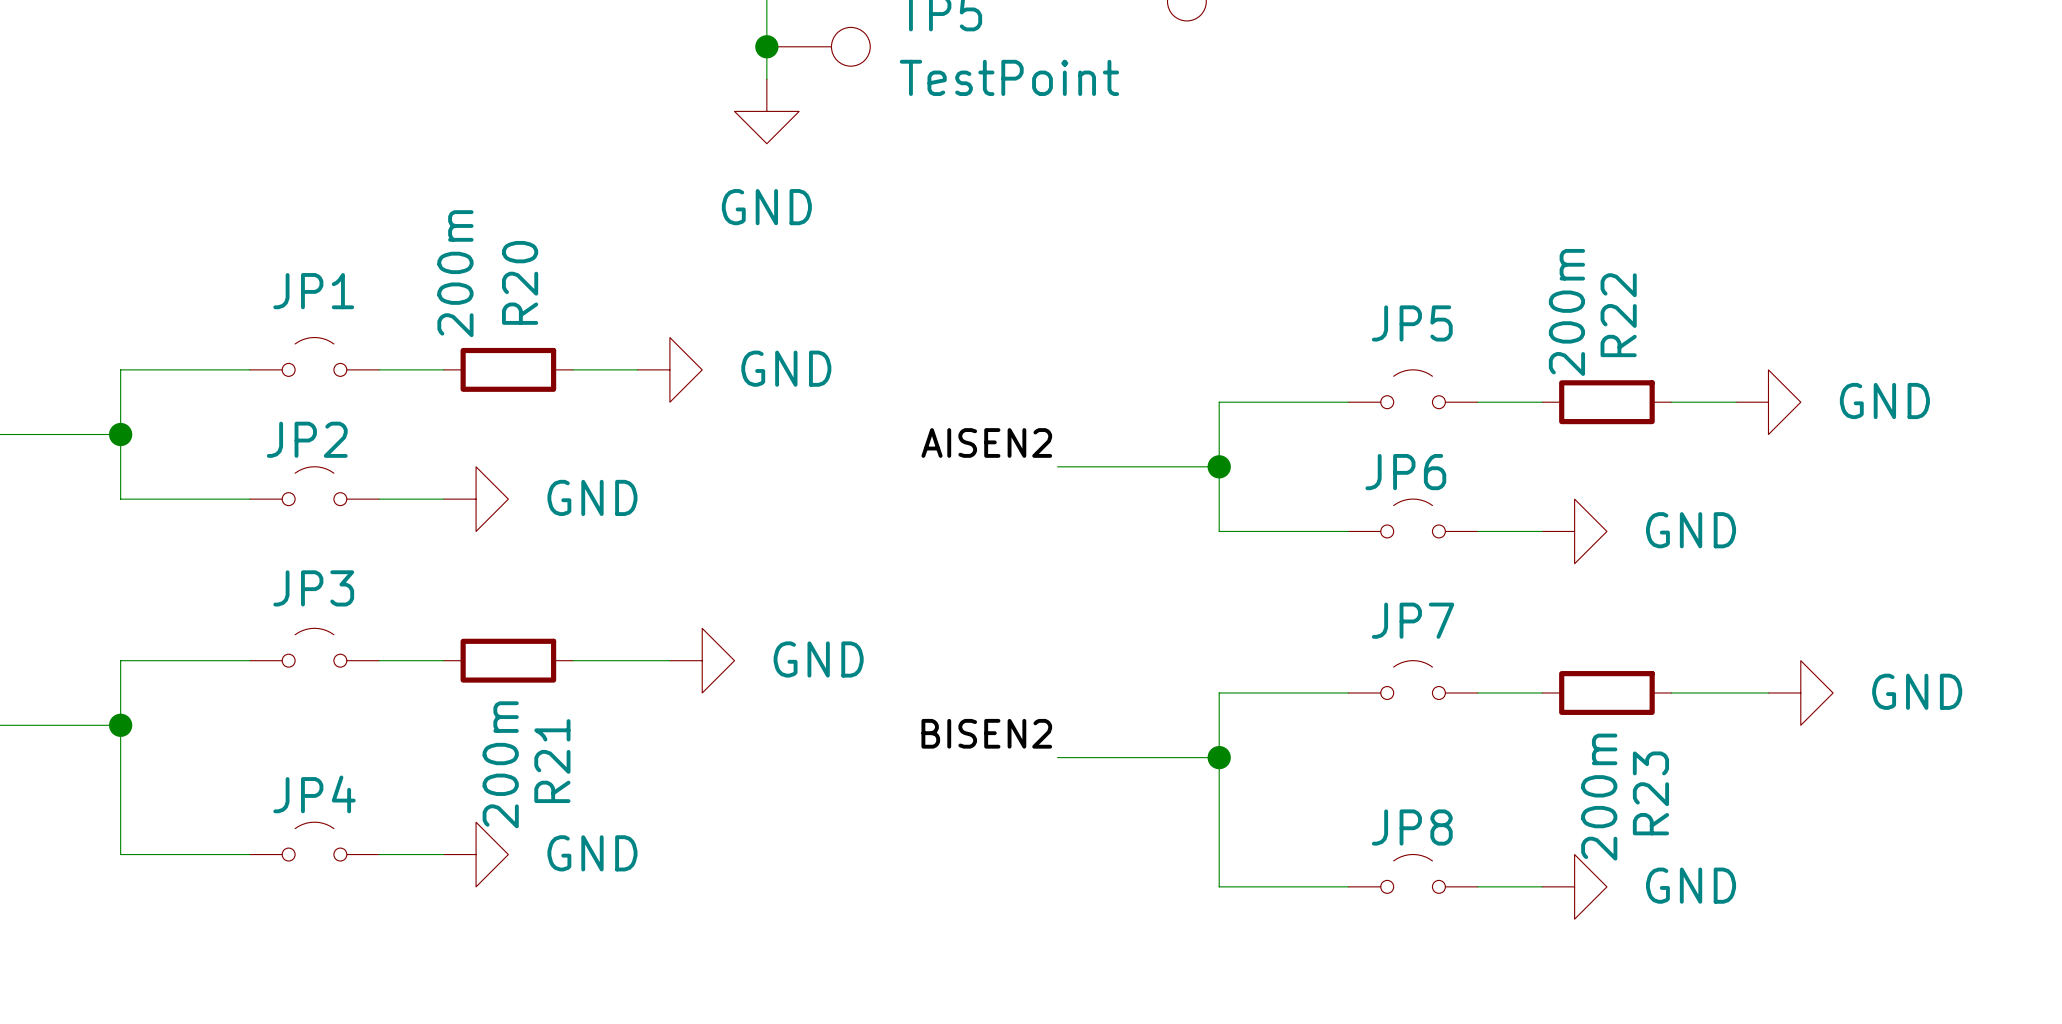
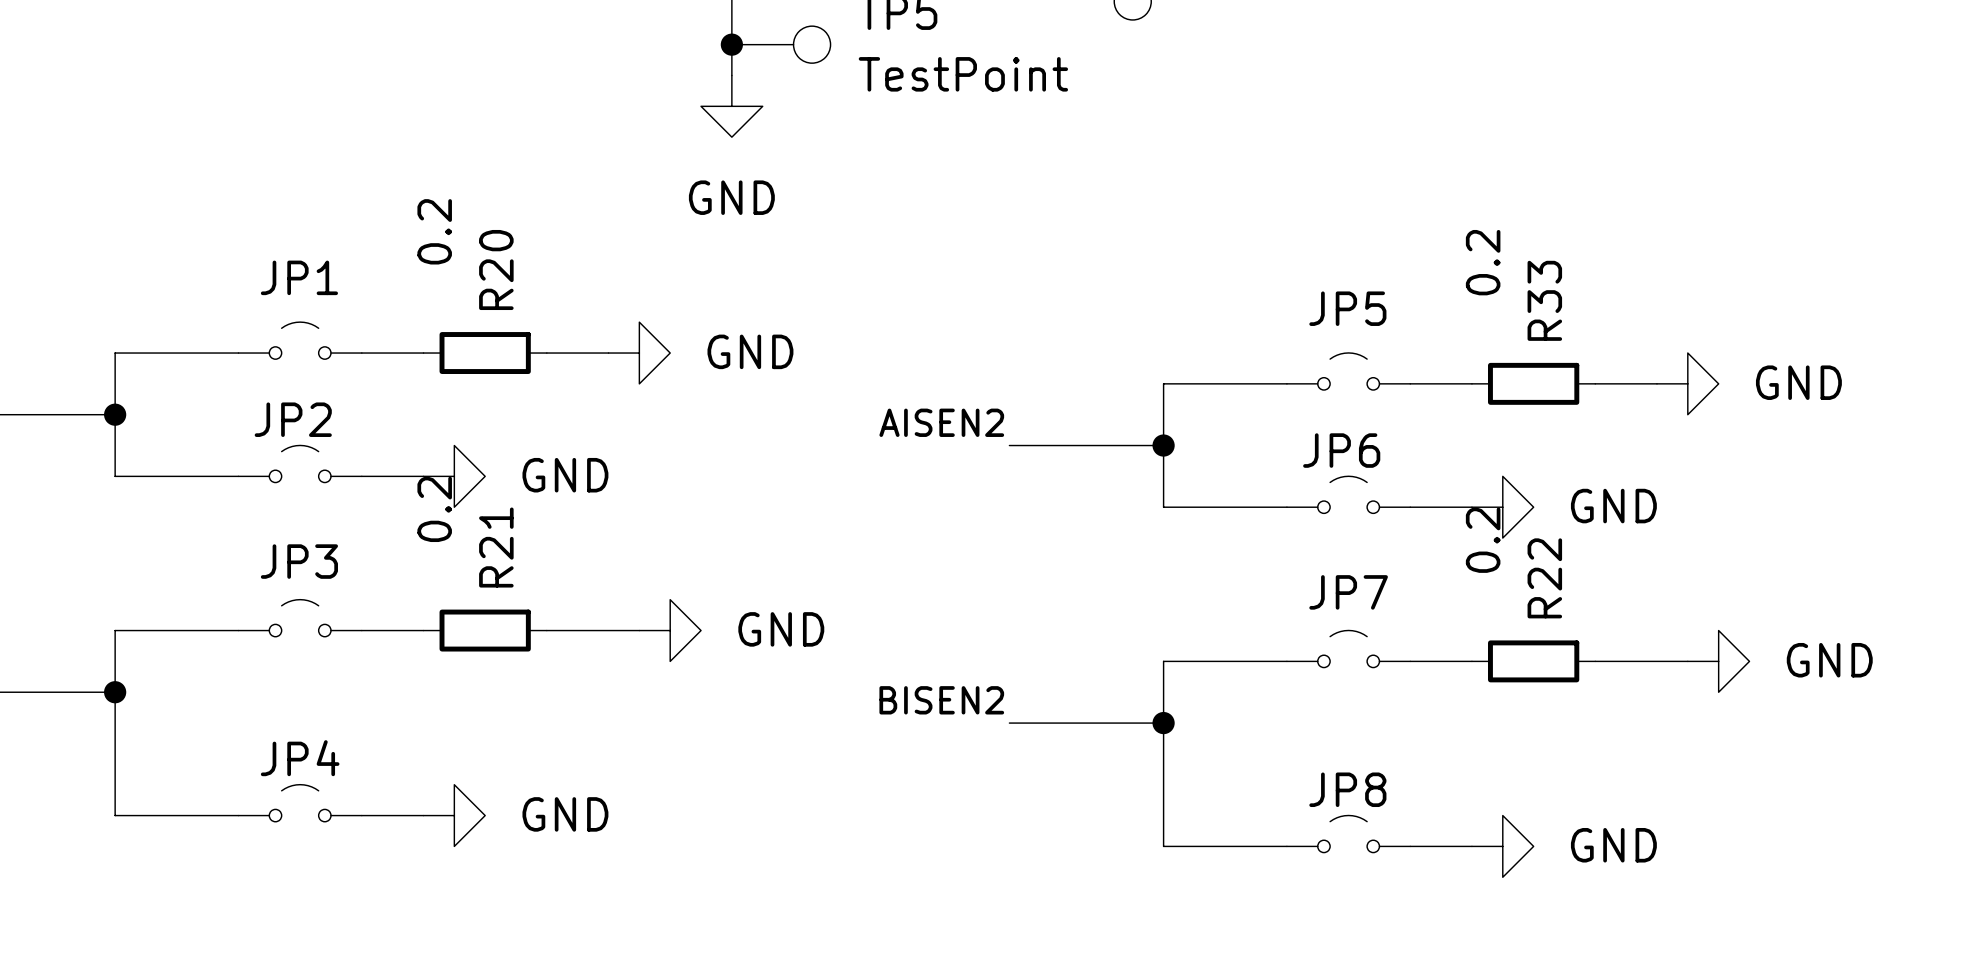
R20 value: 200m (455, 273) -> 0.2 (434, 231)
R22 value: 200m (1566, 312) -> 0.2 (1483, 262)
R22 name: R22 (1618, 315) -> R33 (1544, 300)
R21 name position: R21 (552, 761) -> R21 (496, 547)
R21 value: 200m (500, 764) -> 0.2 (434, 509)
R23 name: R23 (1650, 793) -> R22 (1544, 578)
R23 value: 200m (1599, 797) -> 0.2 (1483, 540)

